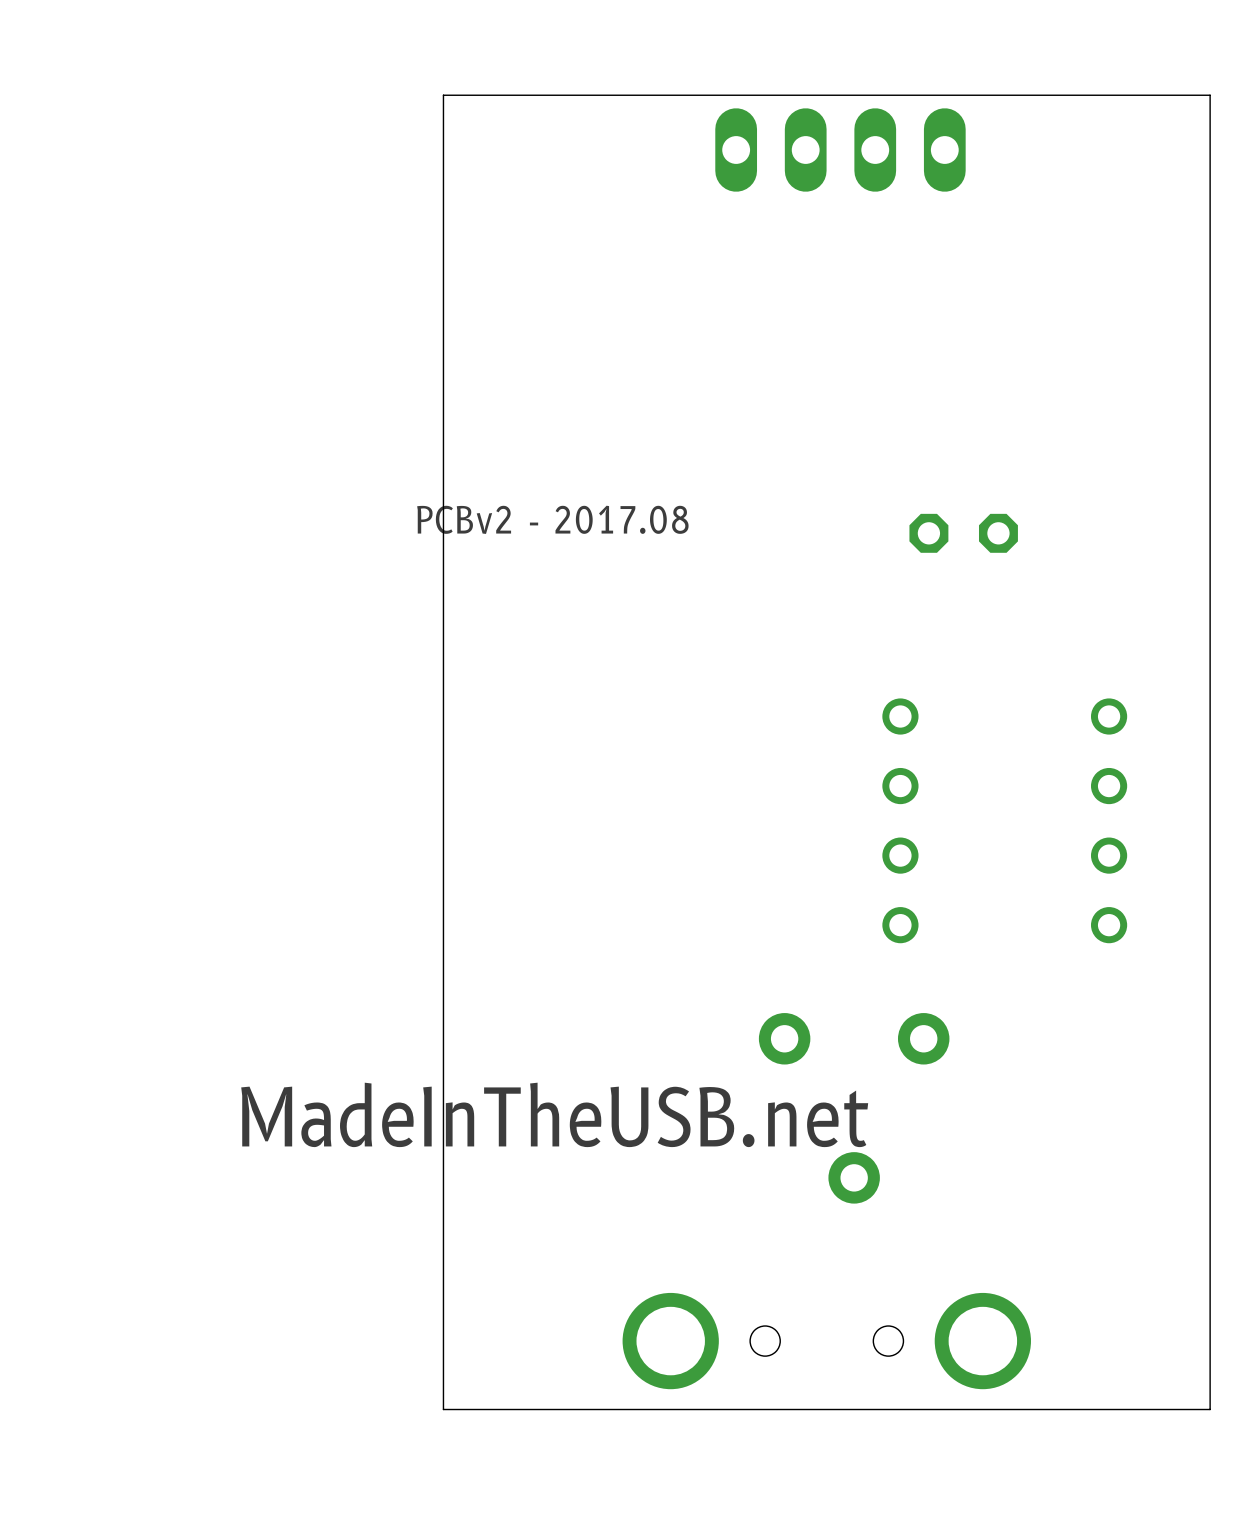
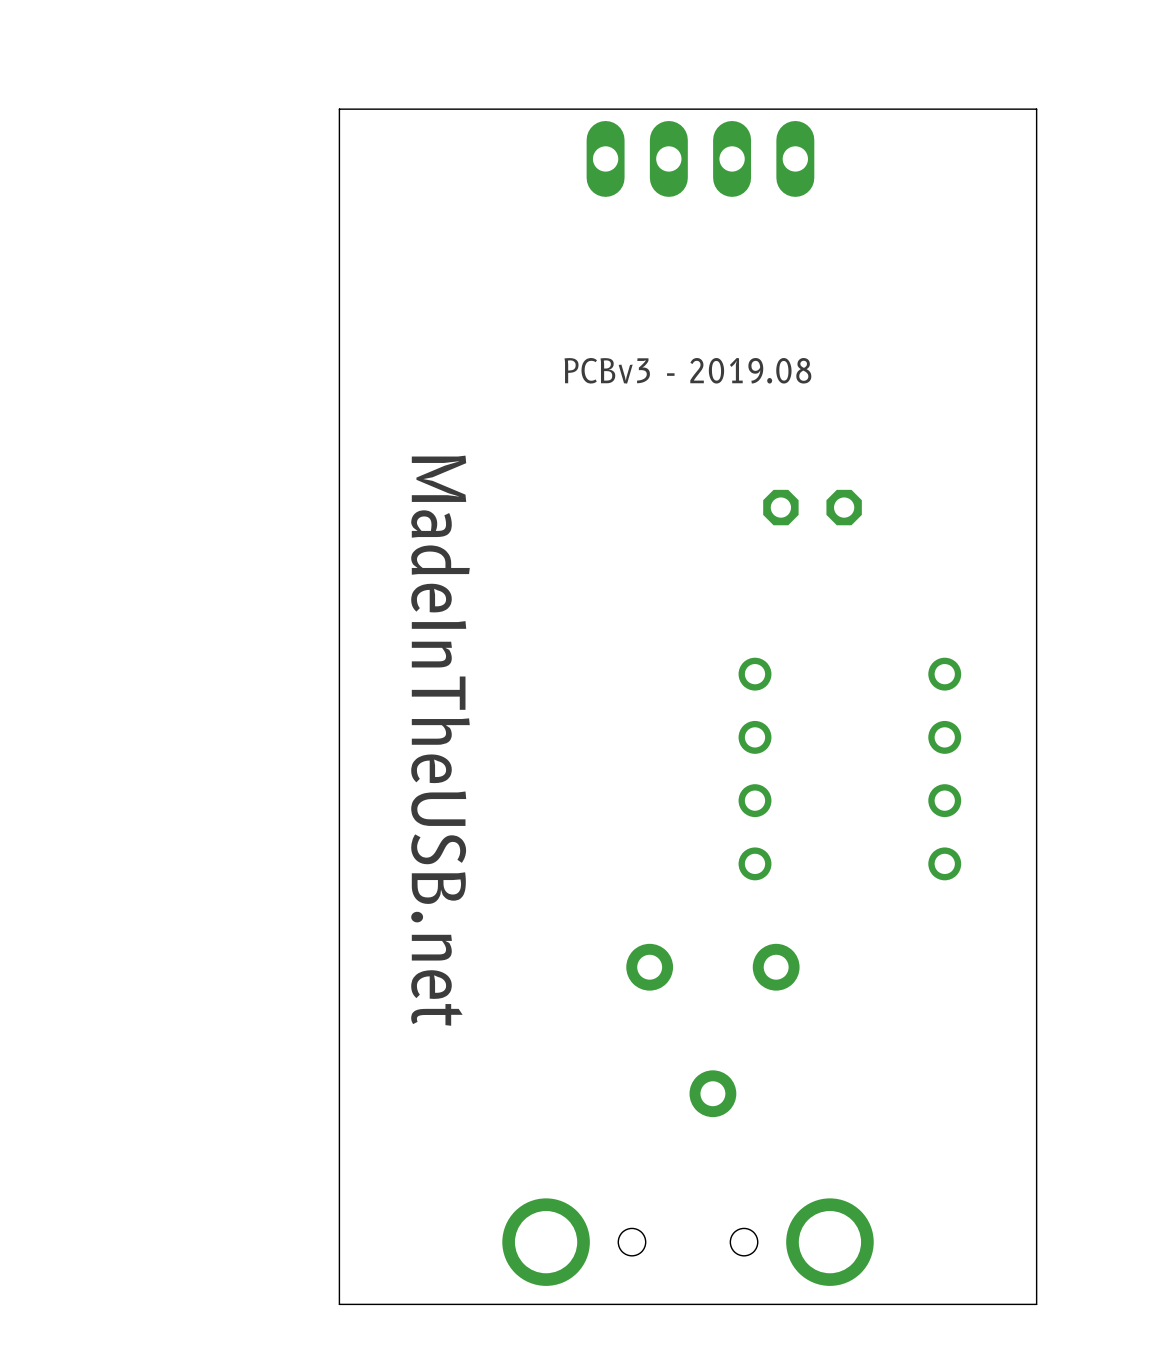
text: none -> PCBv3 - 2019.08 (687, 370)
text: PCBv2 - 2017.08 (552, 519) -> none
text rotation: 0° (554, 1114) -> 90° clockwise (440, 740)

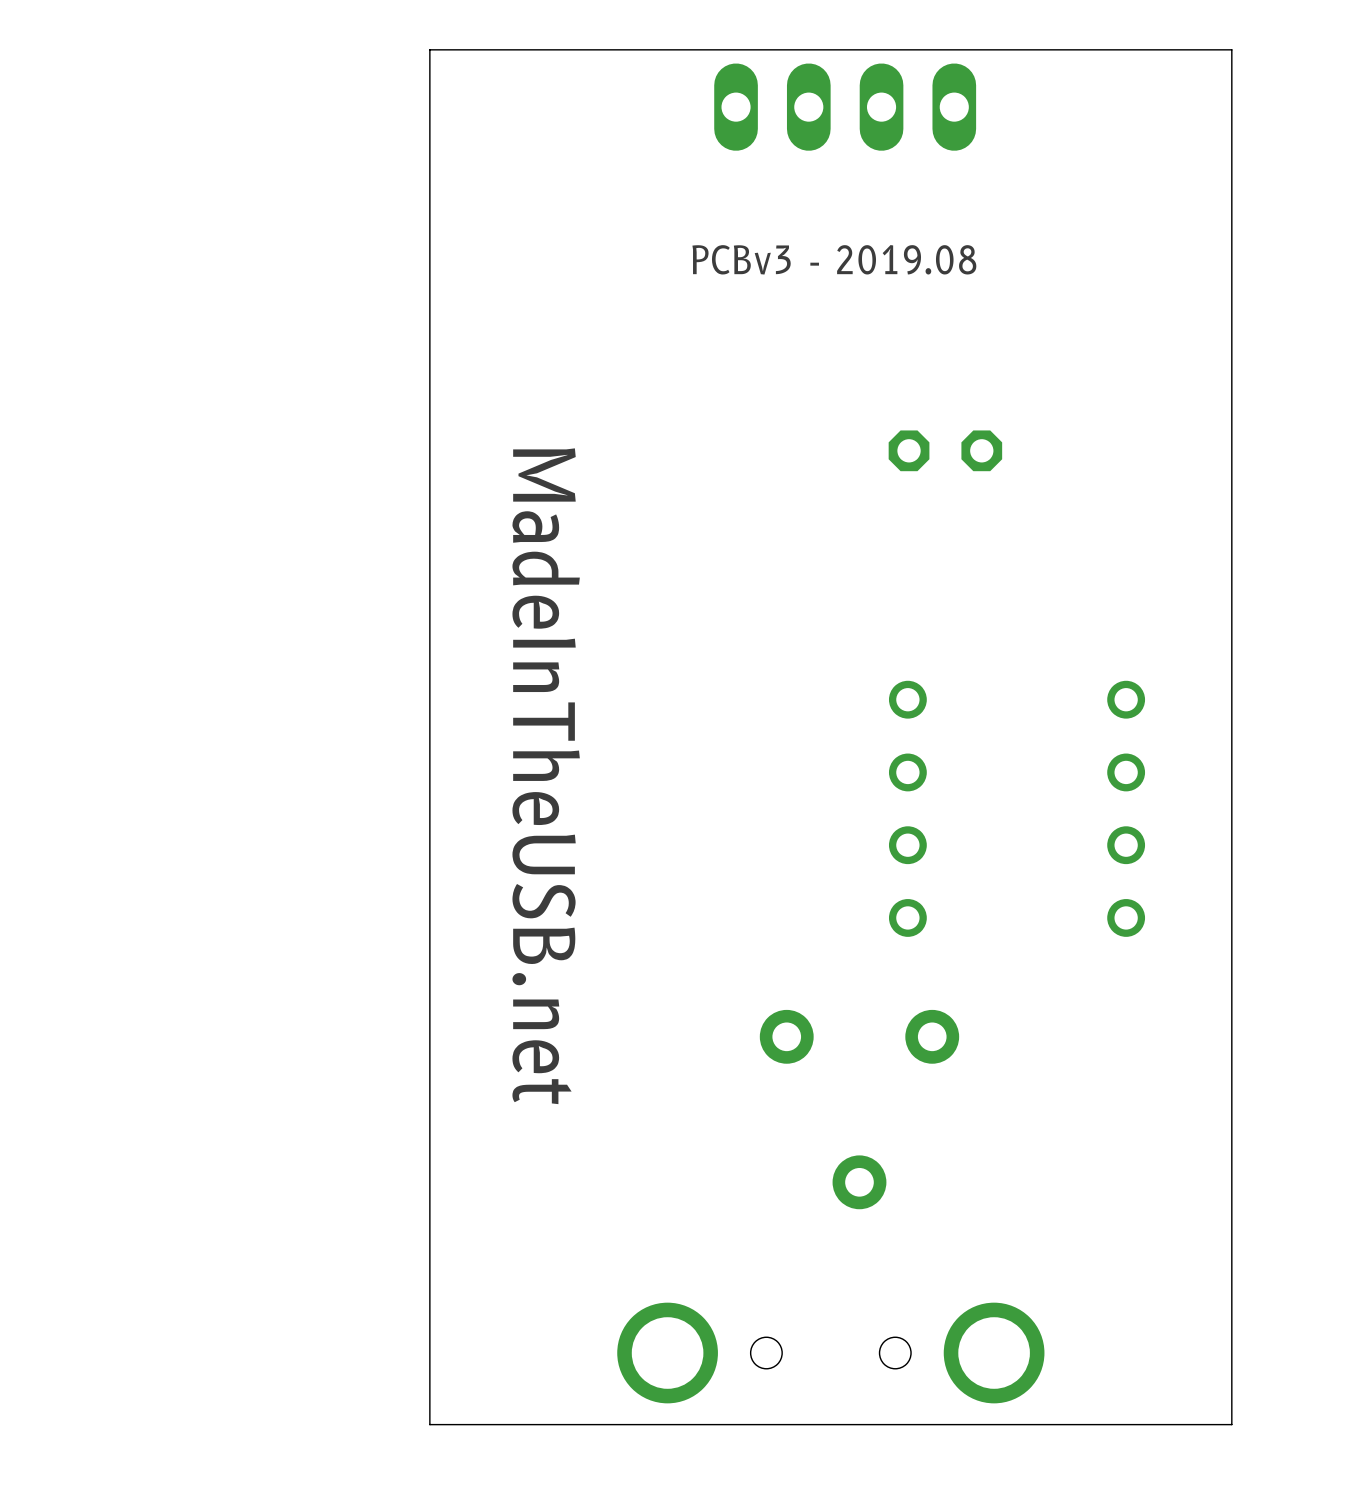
text position: PCBv3 - 2019.08 (687, 370) -> PCBv3 - 2019.08 (834, 259)
part position: (812, 507) -> (945, 450)

